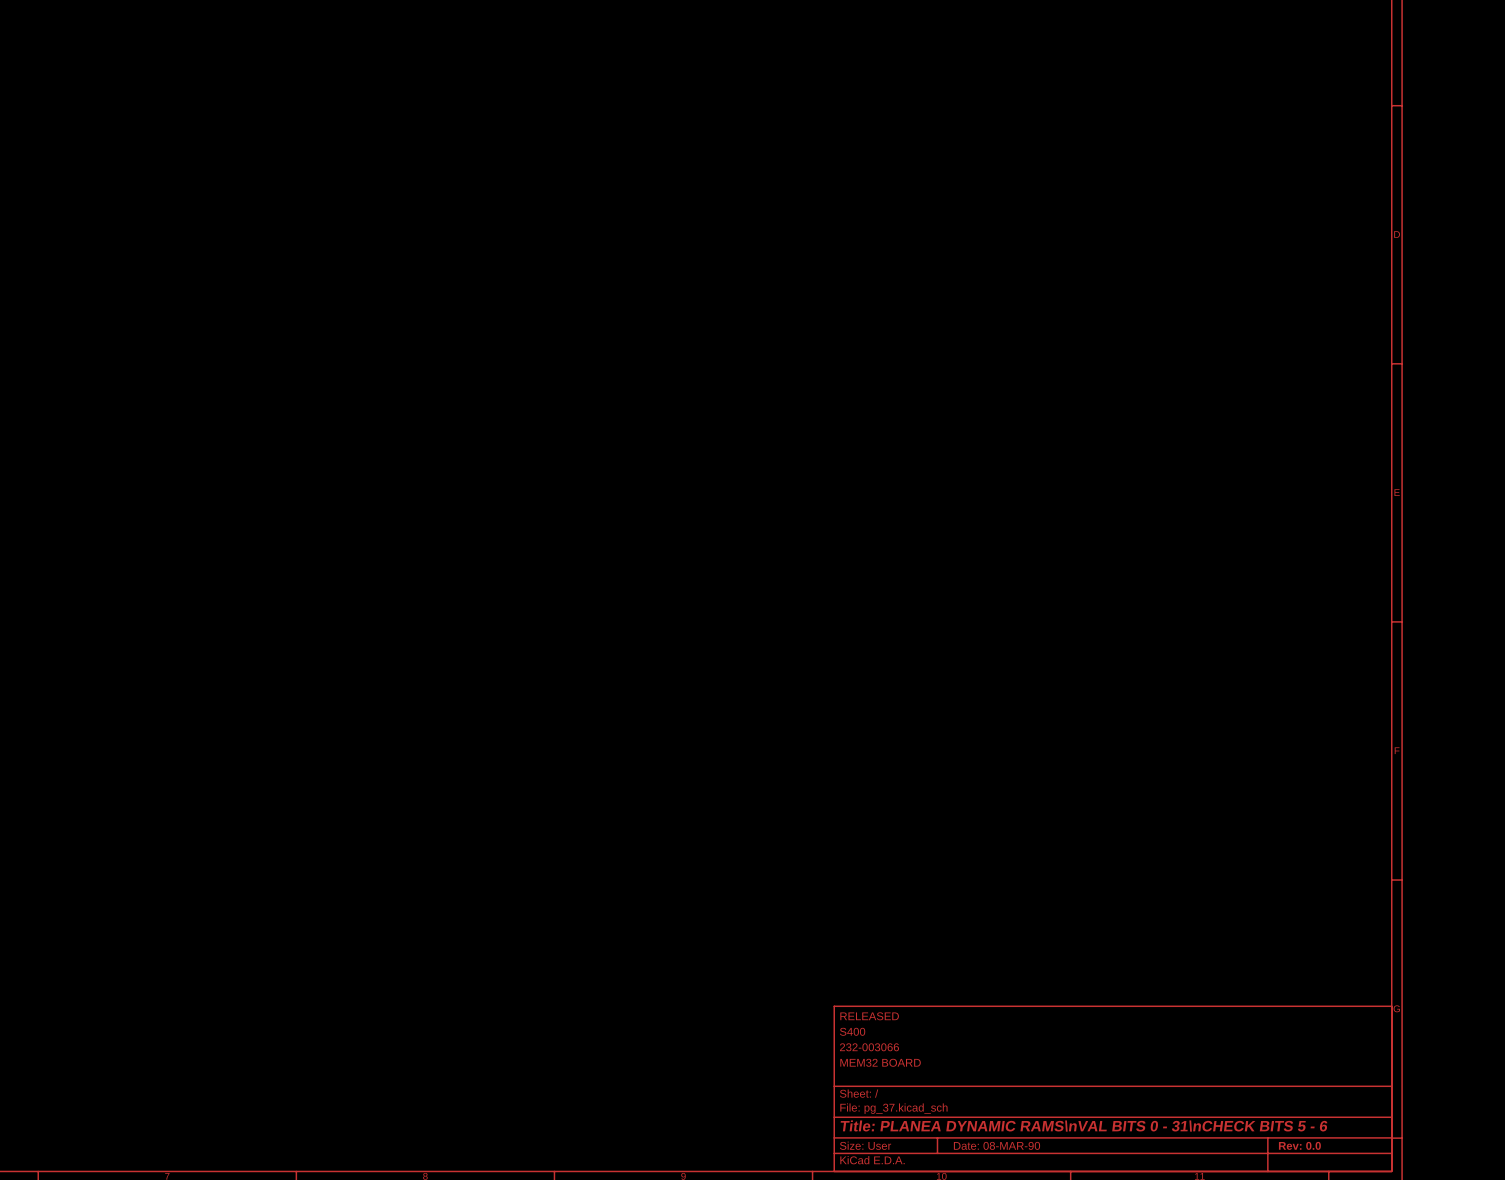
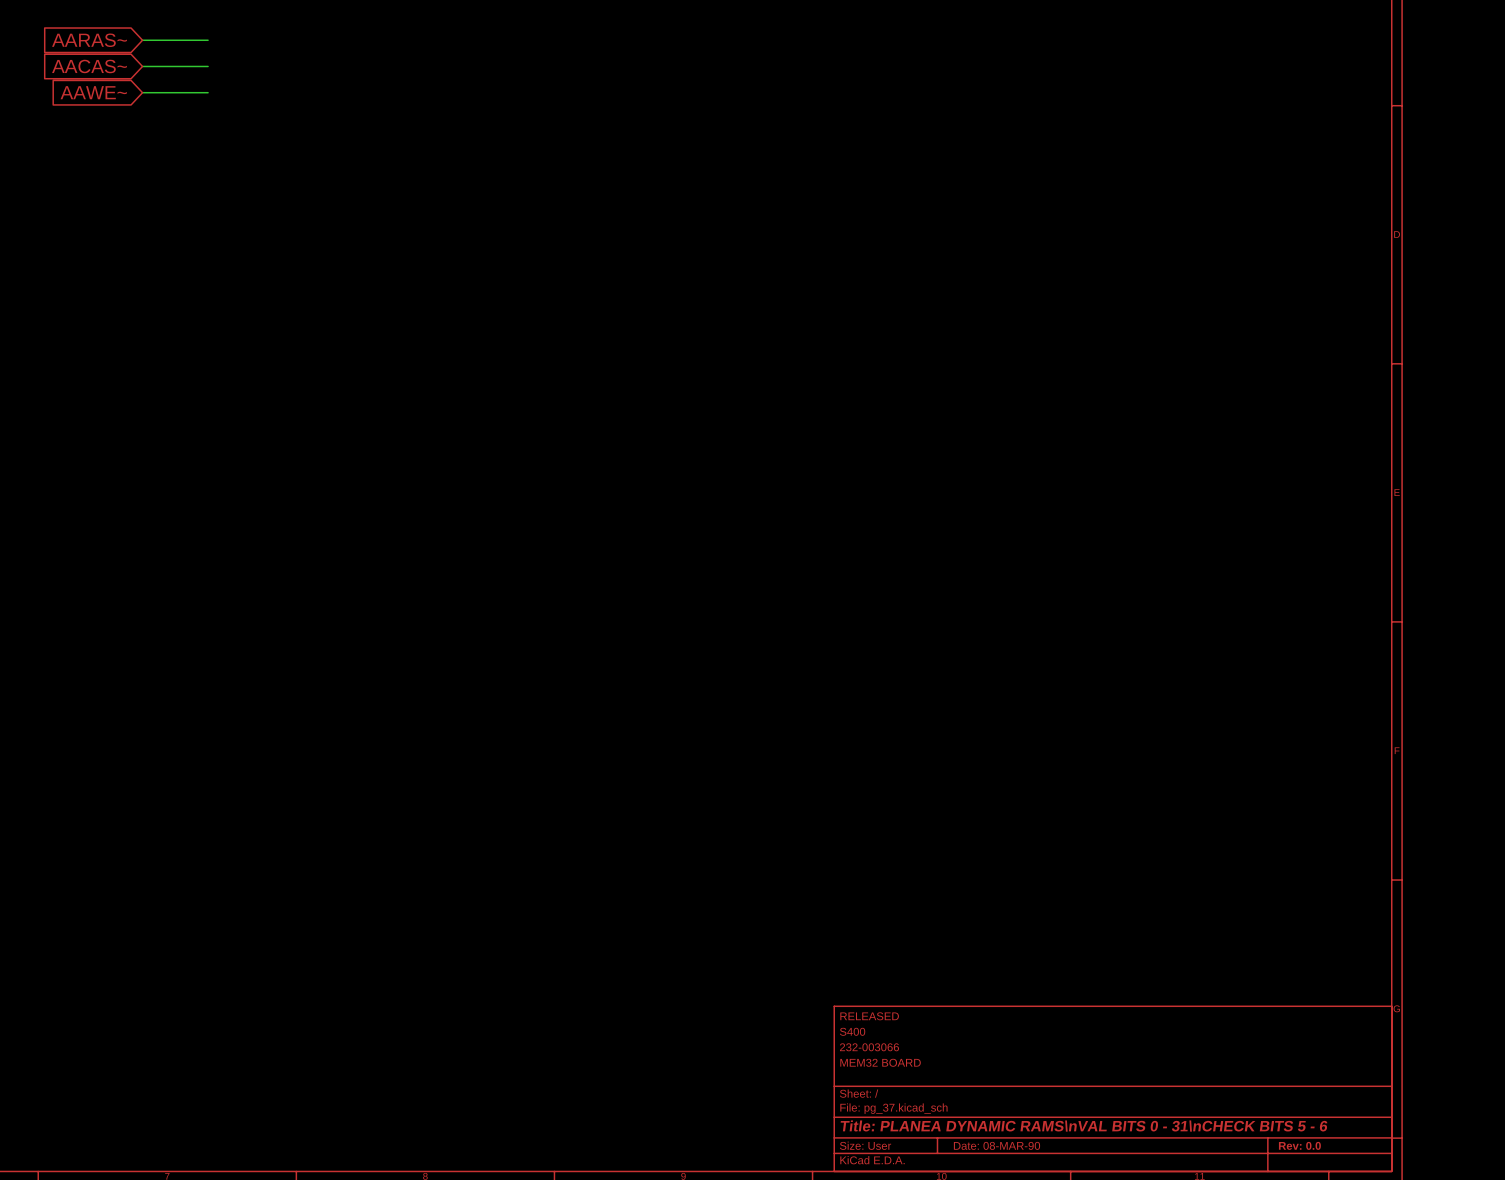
global label: none -> AARAS~ (89, 40)
wire: none -> (142, 40) (208, 40)
global label: none -> AACAS~ (89, 66)
wire: none -> (142, 66) (208, 66)
global label: none -> AAWE~ (93, 92)
wire: none -> (142, 92) (208, 92)

